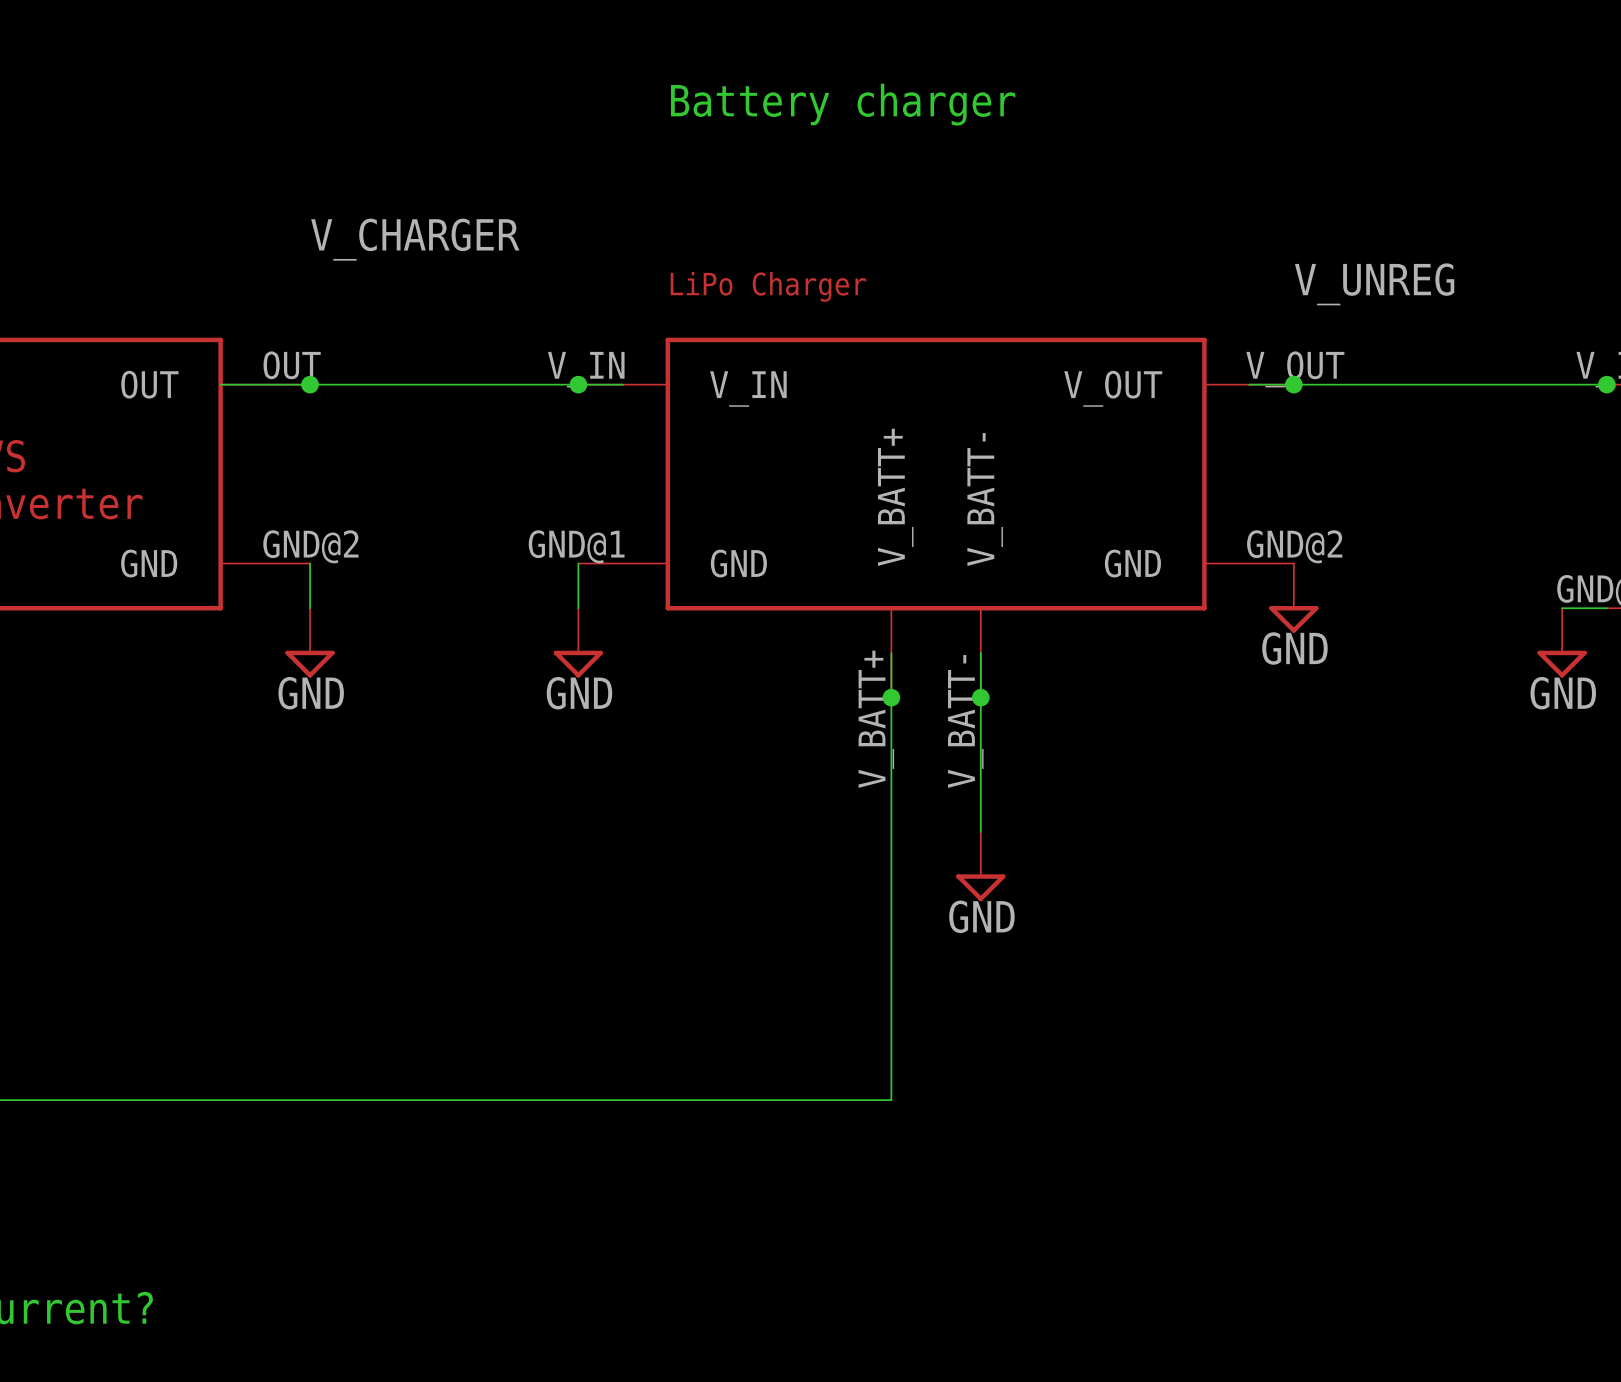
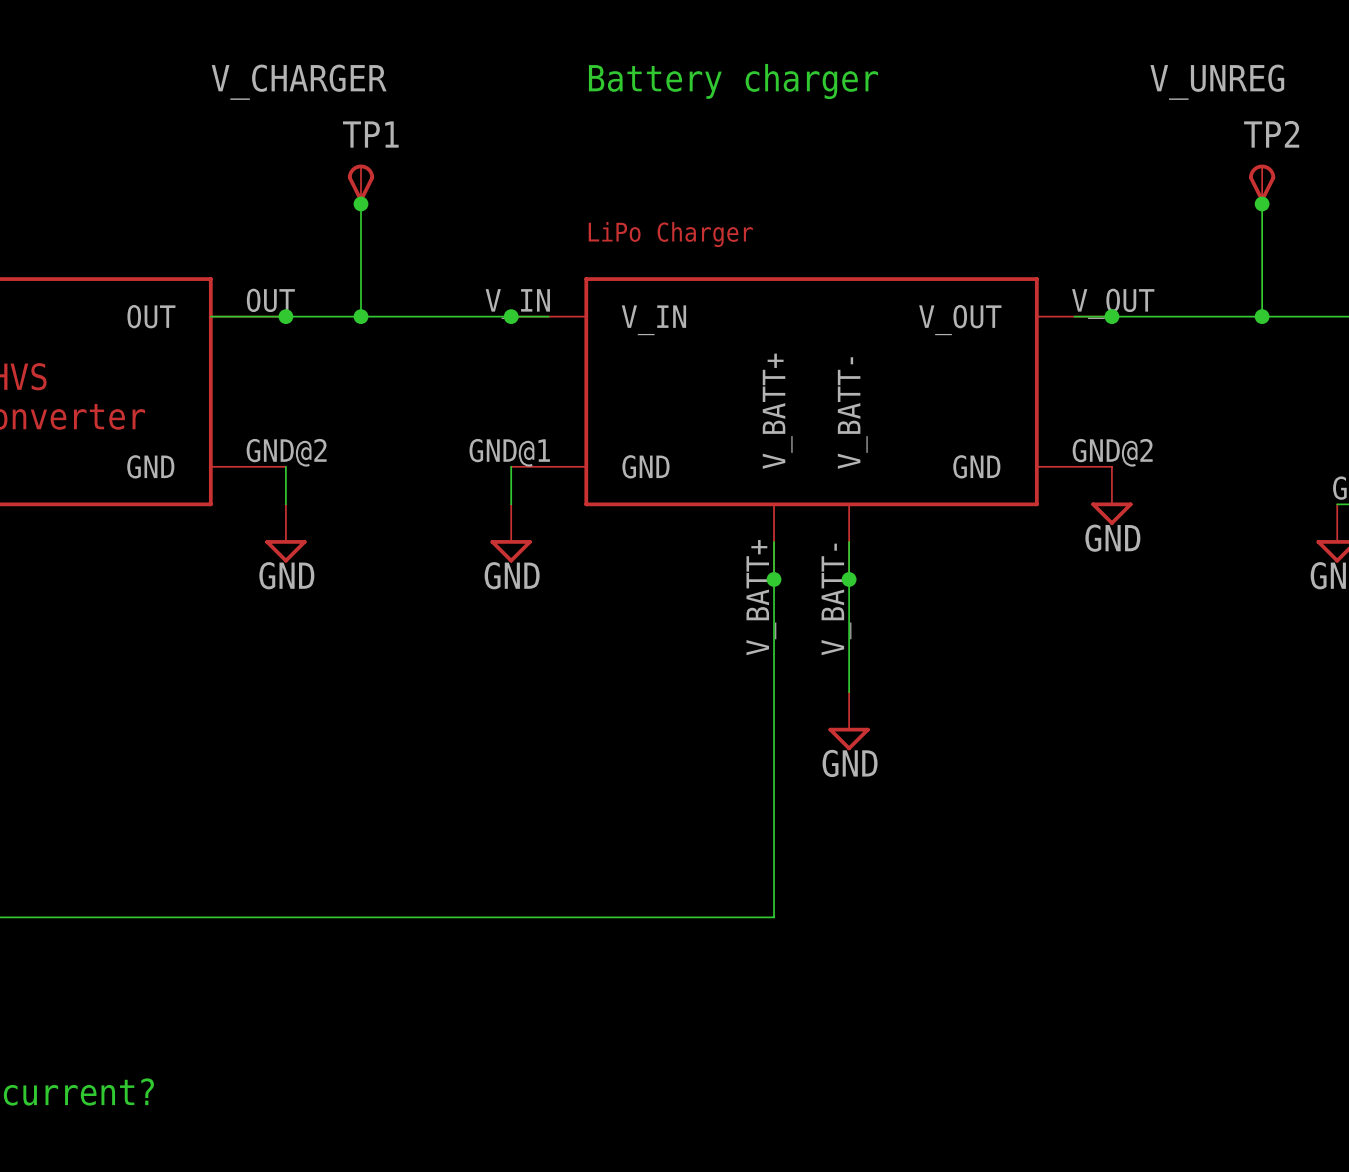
TP1: none -> (361, 184)
TP2: none -> (1262, 184)
label position: V_CHARGER (415, 239) -> V_CHARGER (299, 82)
wire: none -> (361, 203) (361, 316)
junction: none -> (361, 203)
wire: none -> (1262, 203) (1262, 316)
junction: none -> (1262, 203)
label position: V_UNREG (1374, 284) -> V_UNREG (1217, 82)
junction: none -> (361, 316)
junction: none -> (1262, 316)

